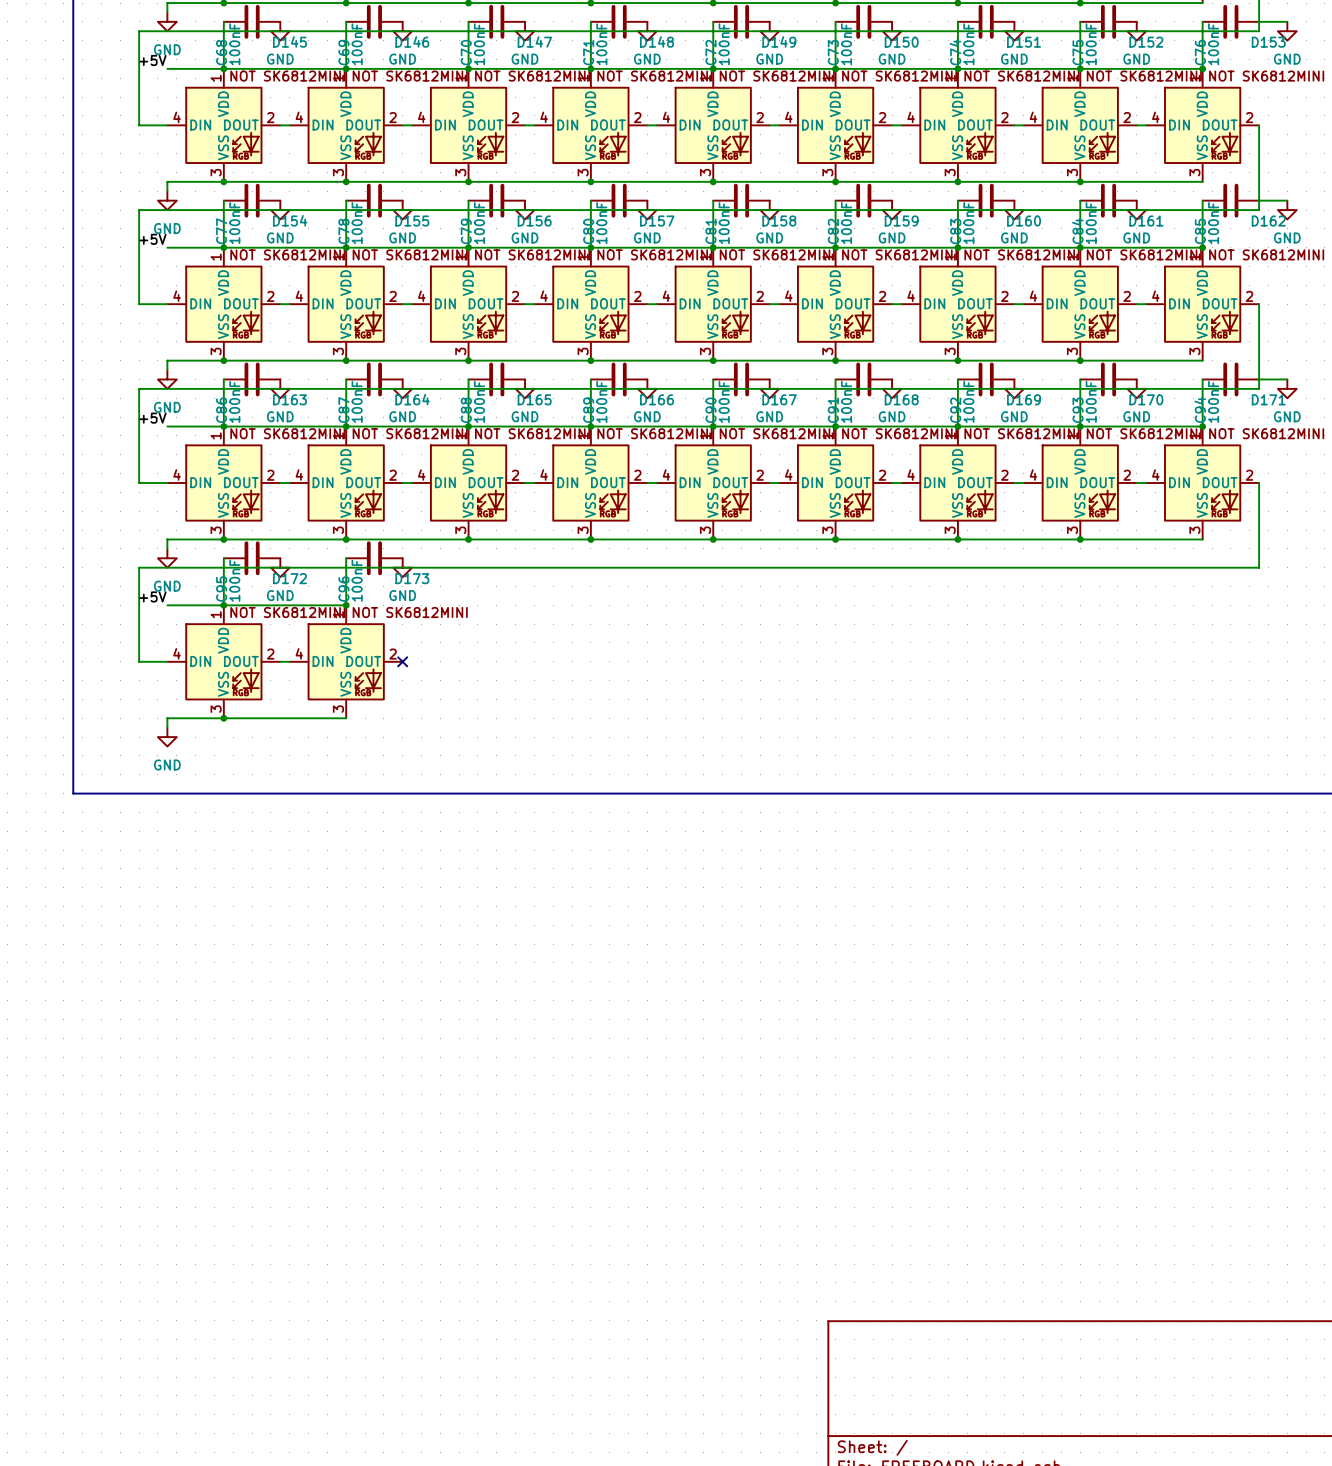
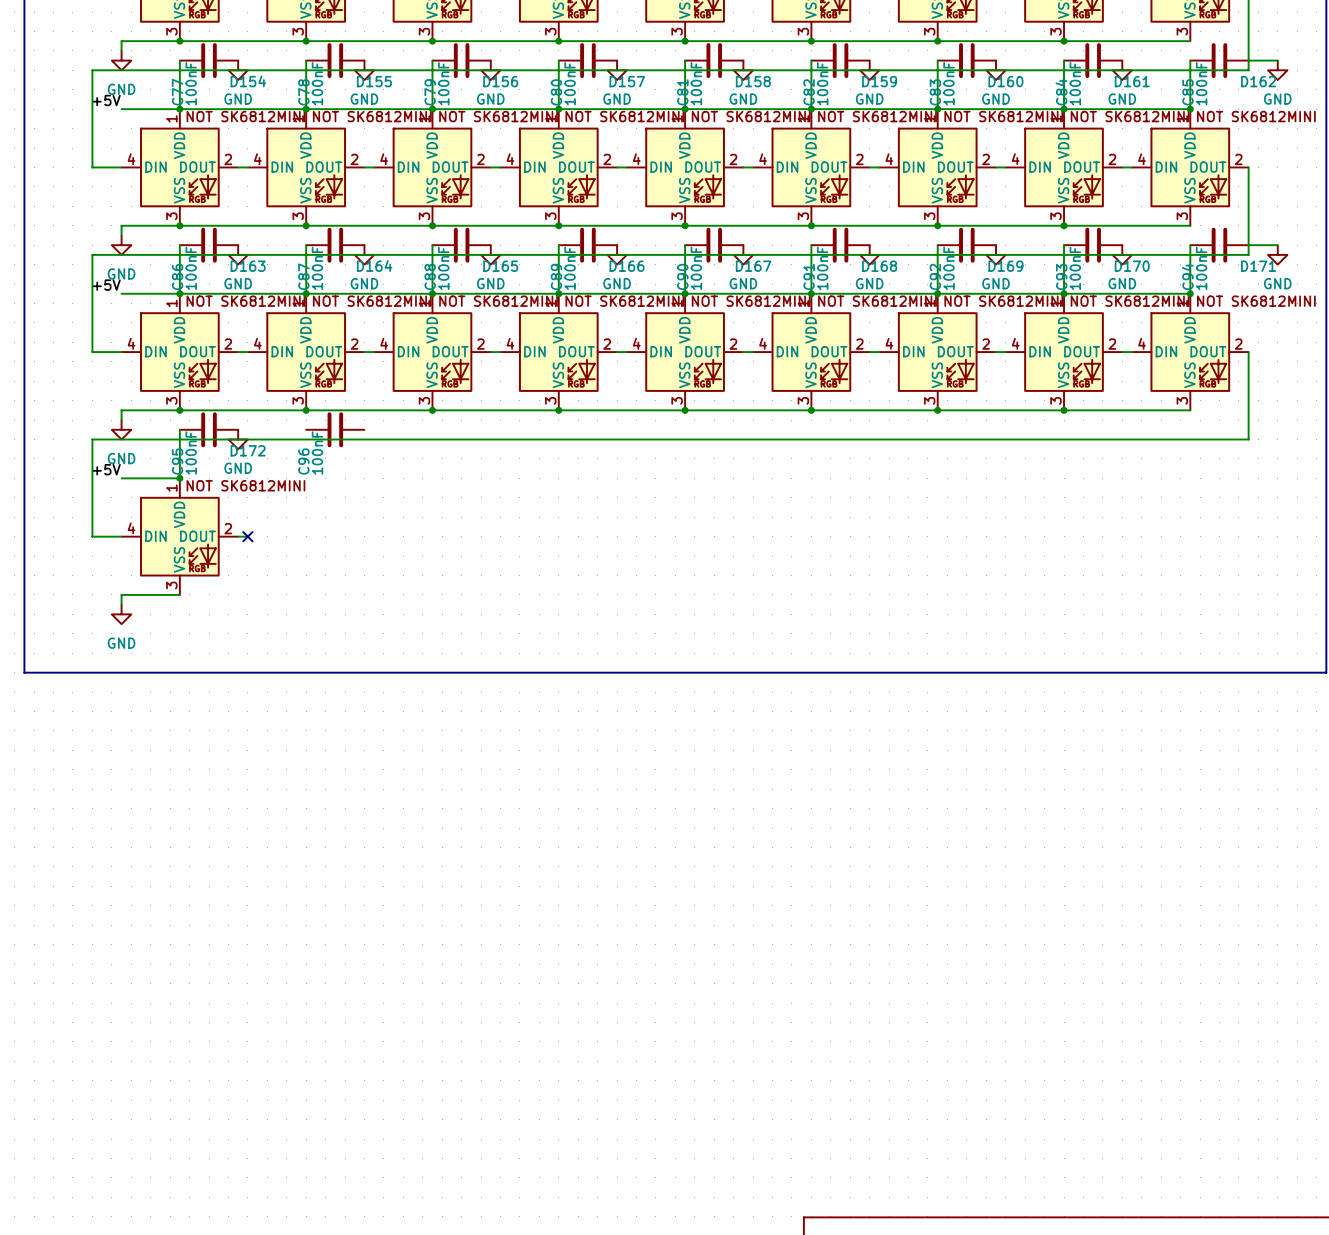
wire: (346, 558) (346, 605) (223, 605) -> none
power symbol: GND (402, 567) -> none
junction: (346, 605) -> none
no-connect mark: none -> (247, 536)
D173: (346, 661) -> none
no-connect mark: (402, 661) -> none
wire: (223, 718) (346, 718) -> none
junction: (223, 718) -> none

